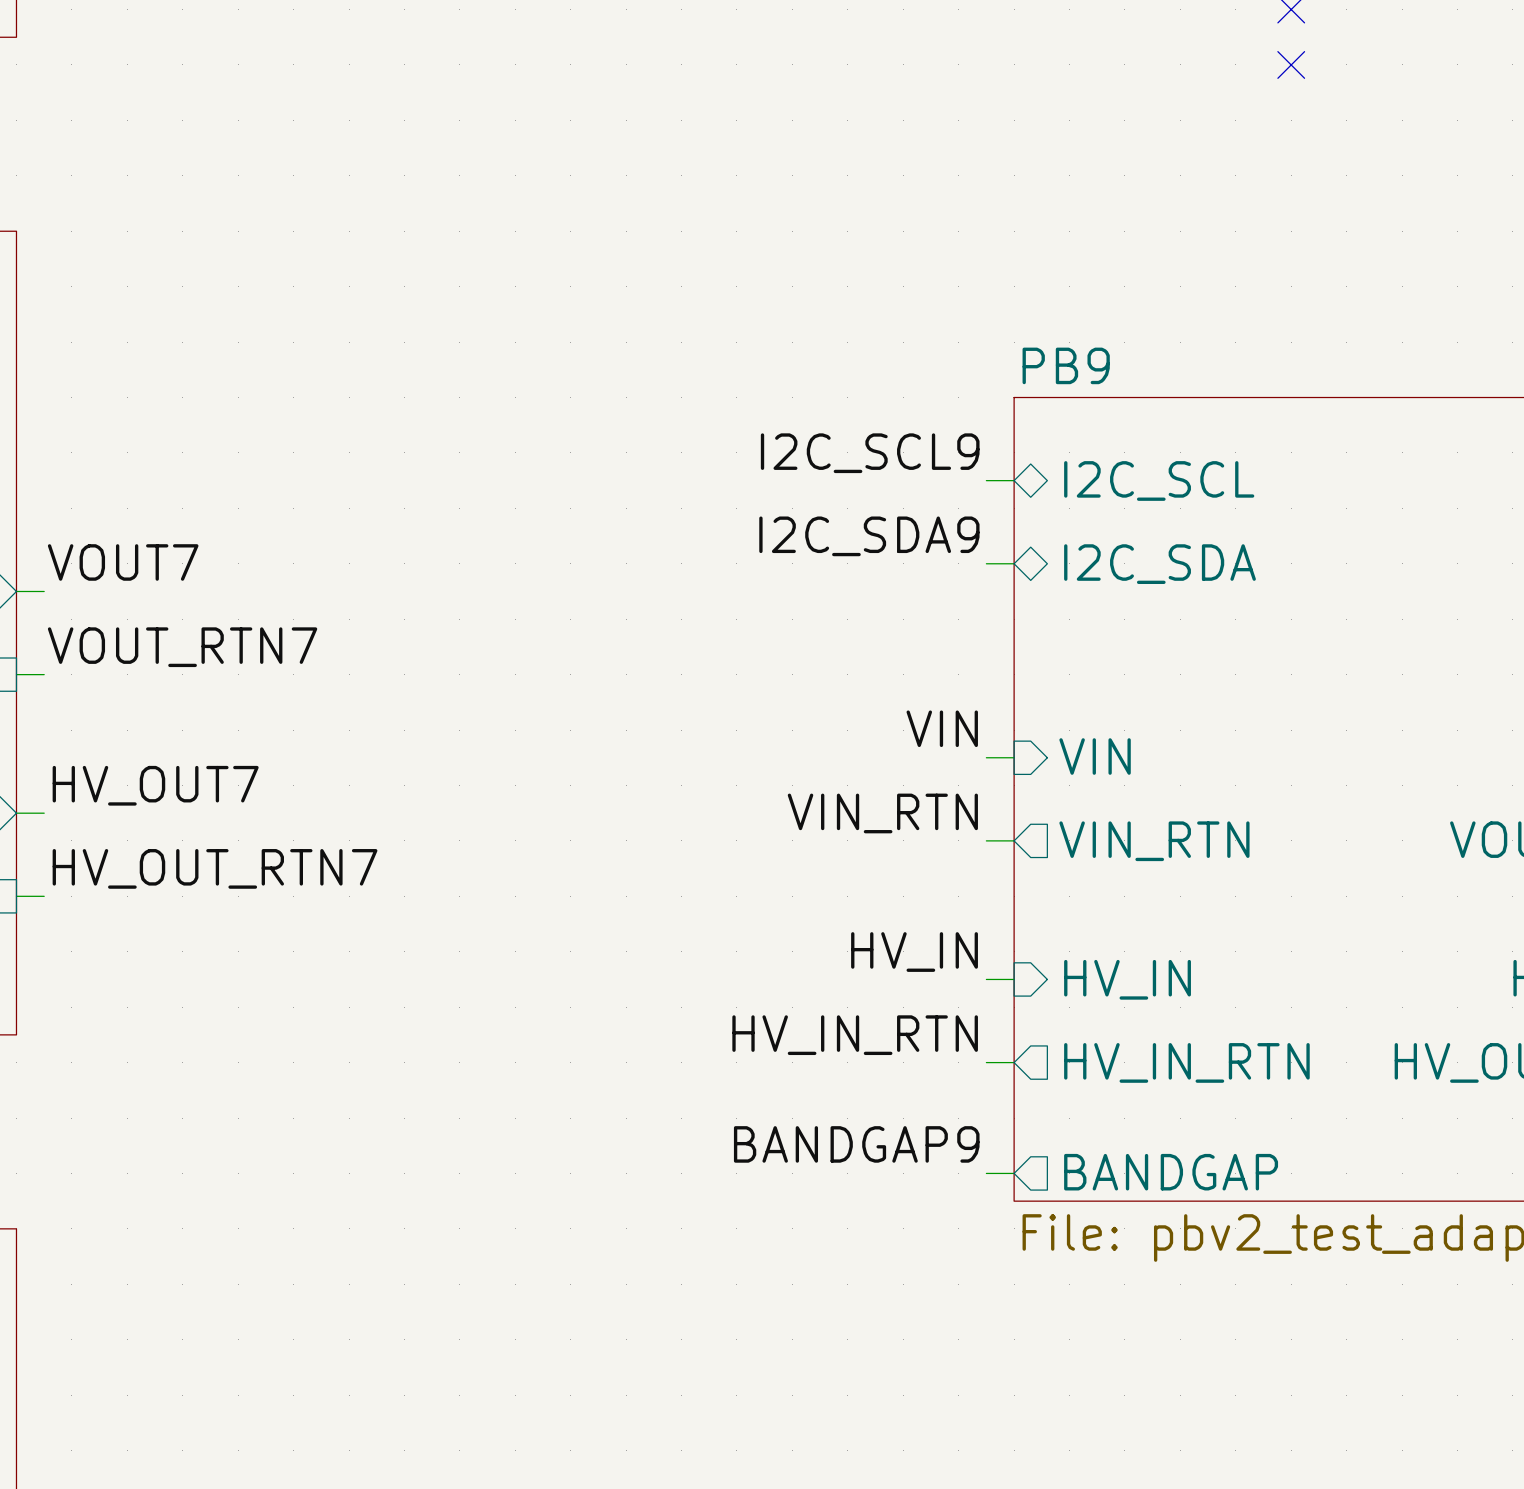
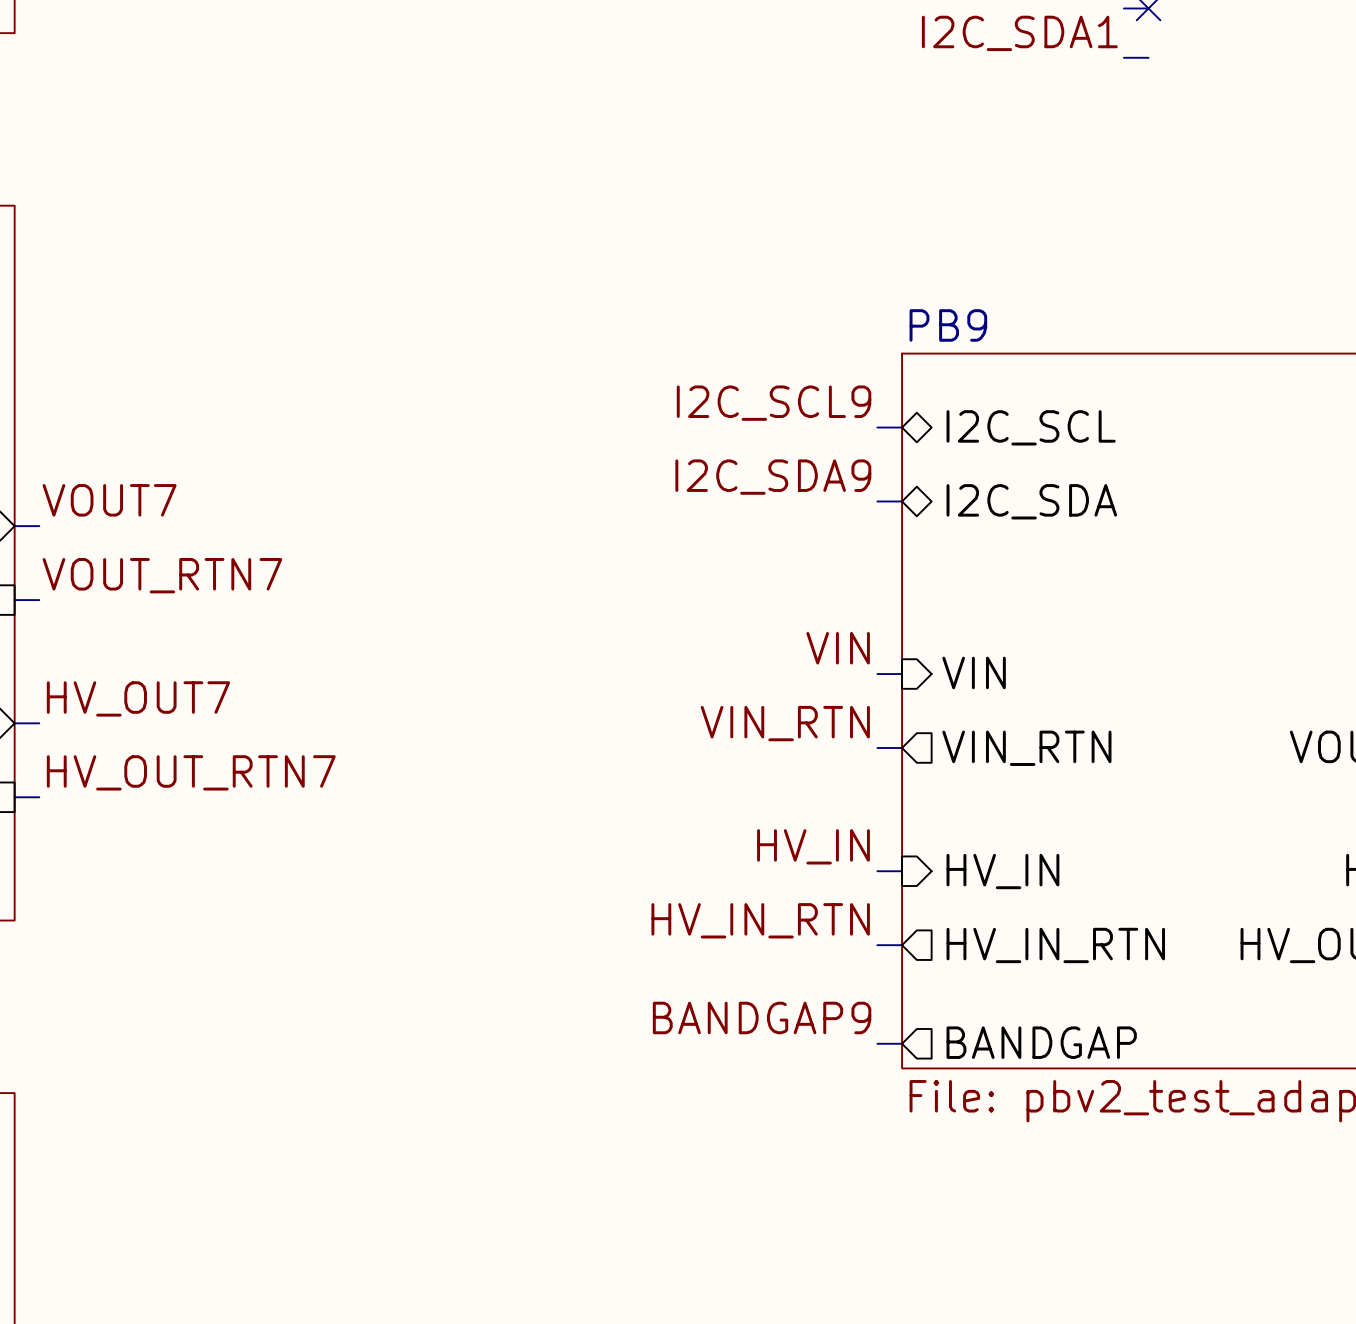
wire: none -> (1123, 8) (1148, 8)
label: none -> I2C_SDA1 (1019, 33)
wire: none -> (1123, 57) (1148, 57)
no-connect mark: (1291, 64) -> none

